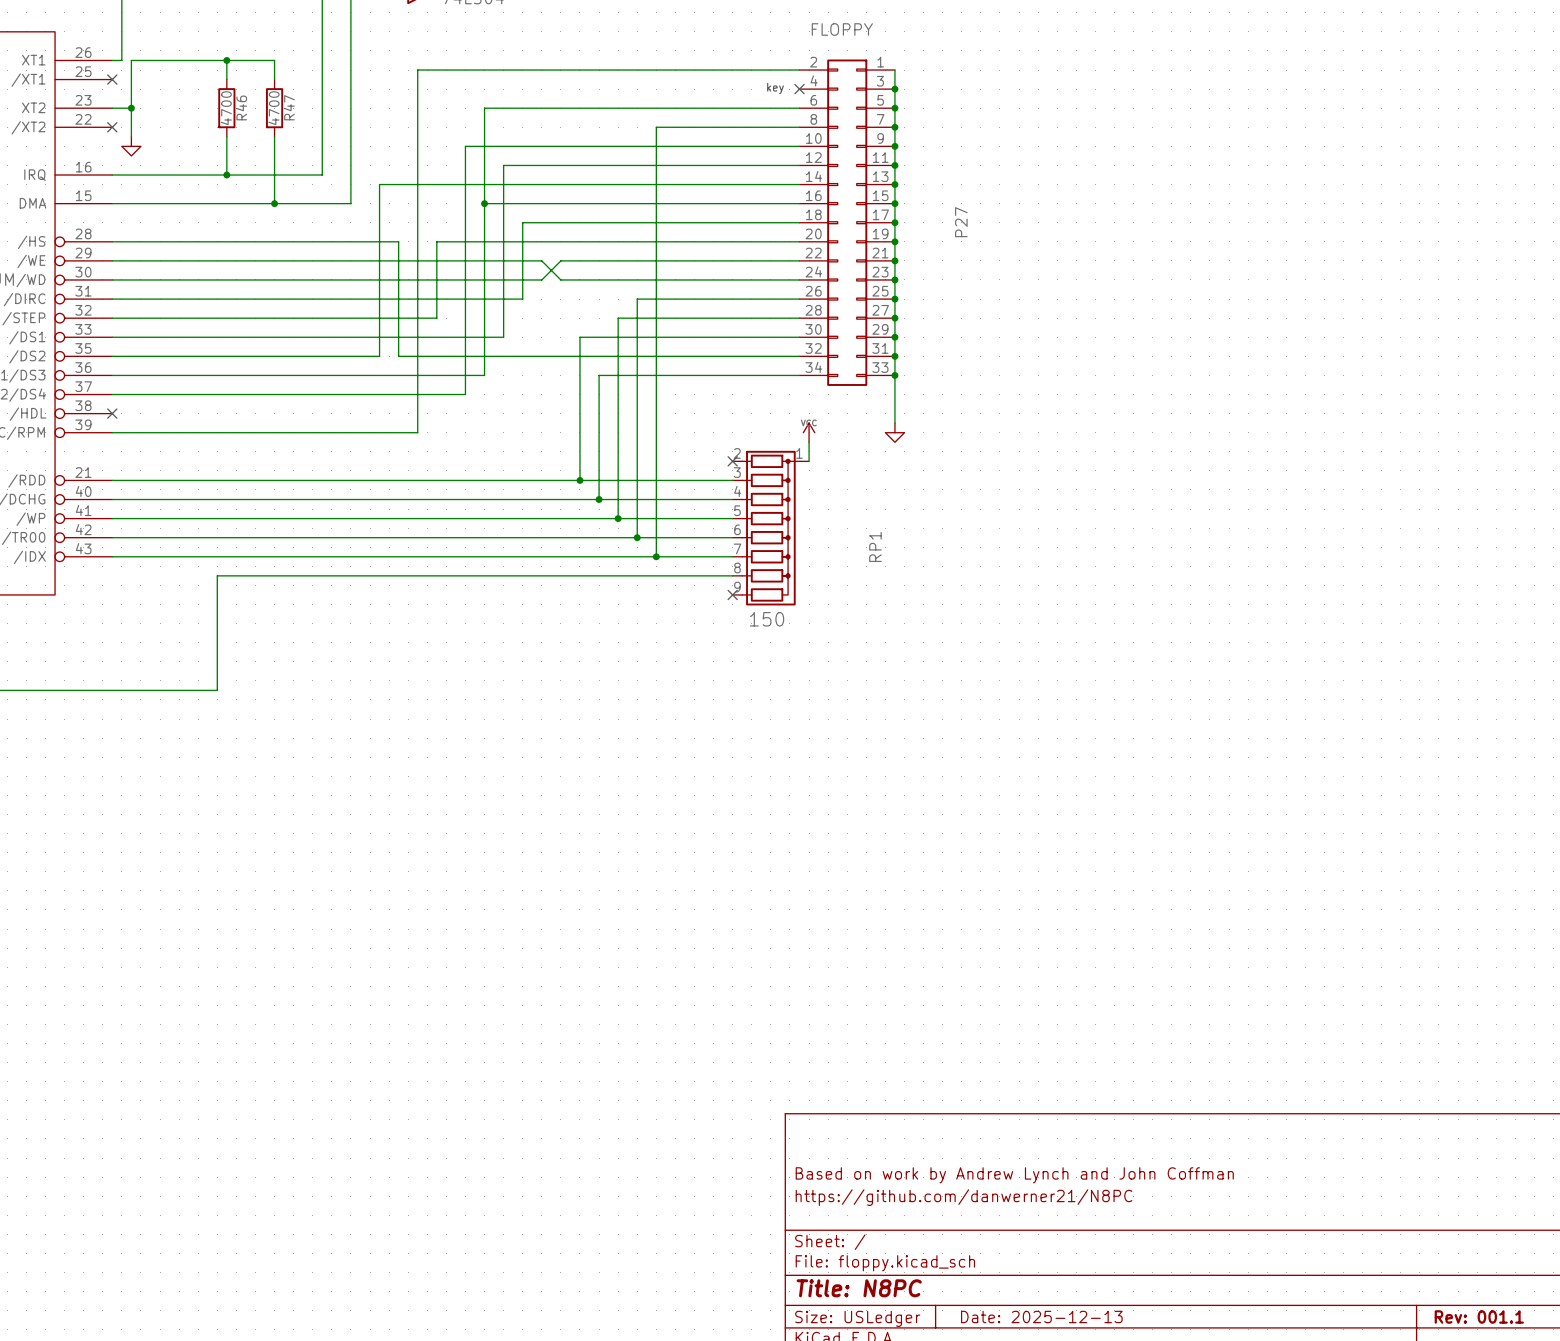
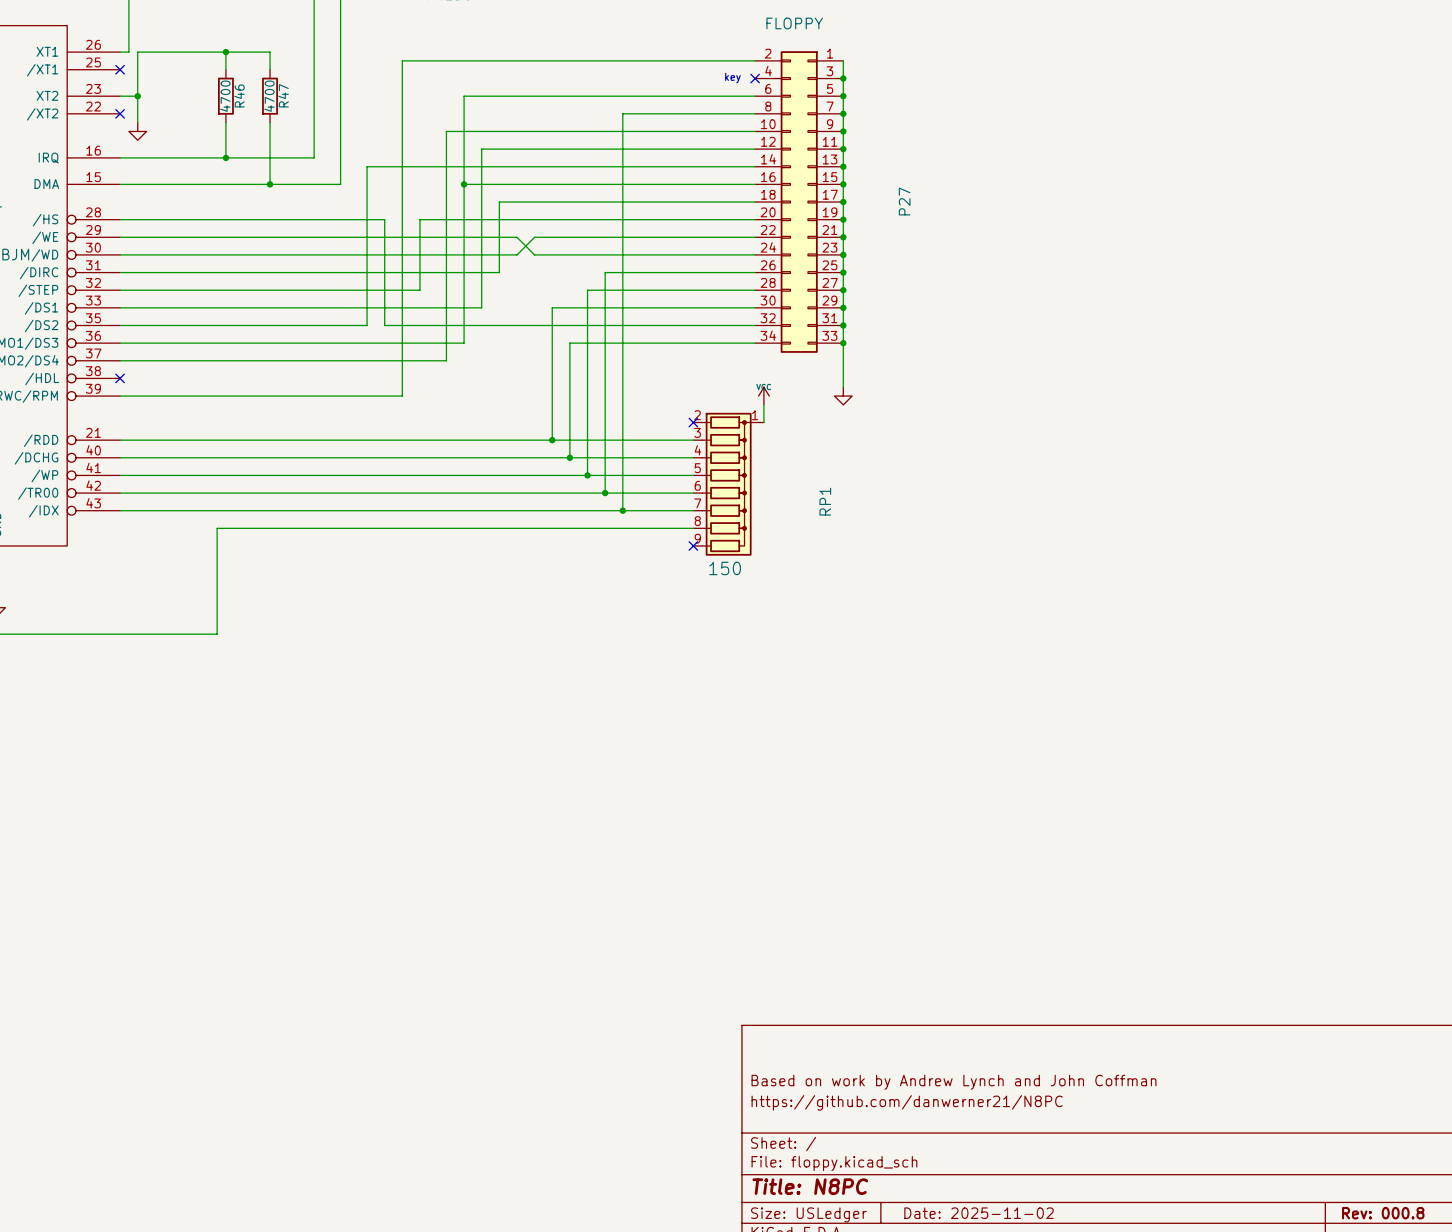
title block: Date: 2025-12-13 (1041, 1316) -> Date: 2025-11-02 (979, 1213)
title block: Rev: 001.1 (1479, 1316) -> Rev: 000.8 (1383, 1213)

